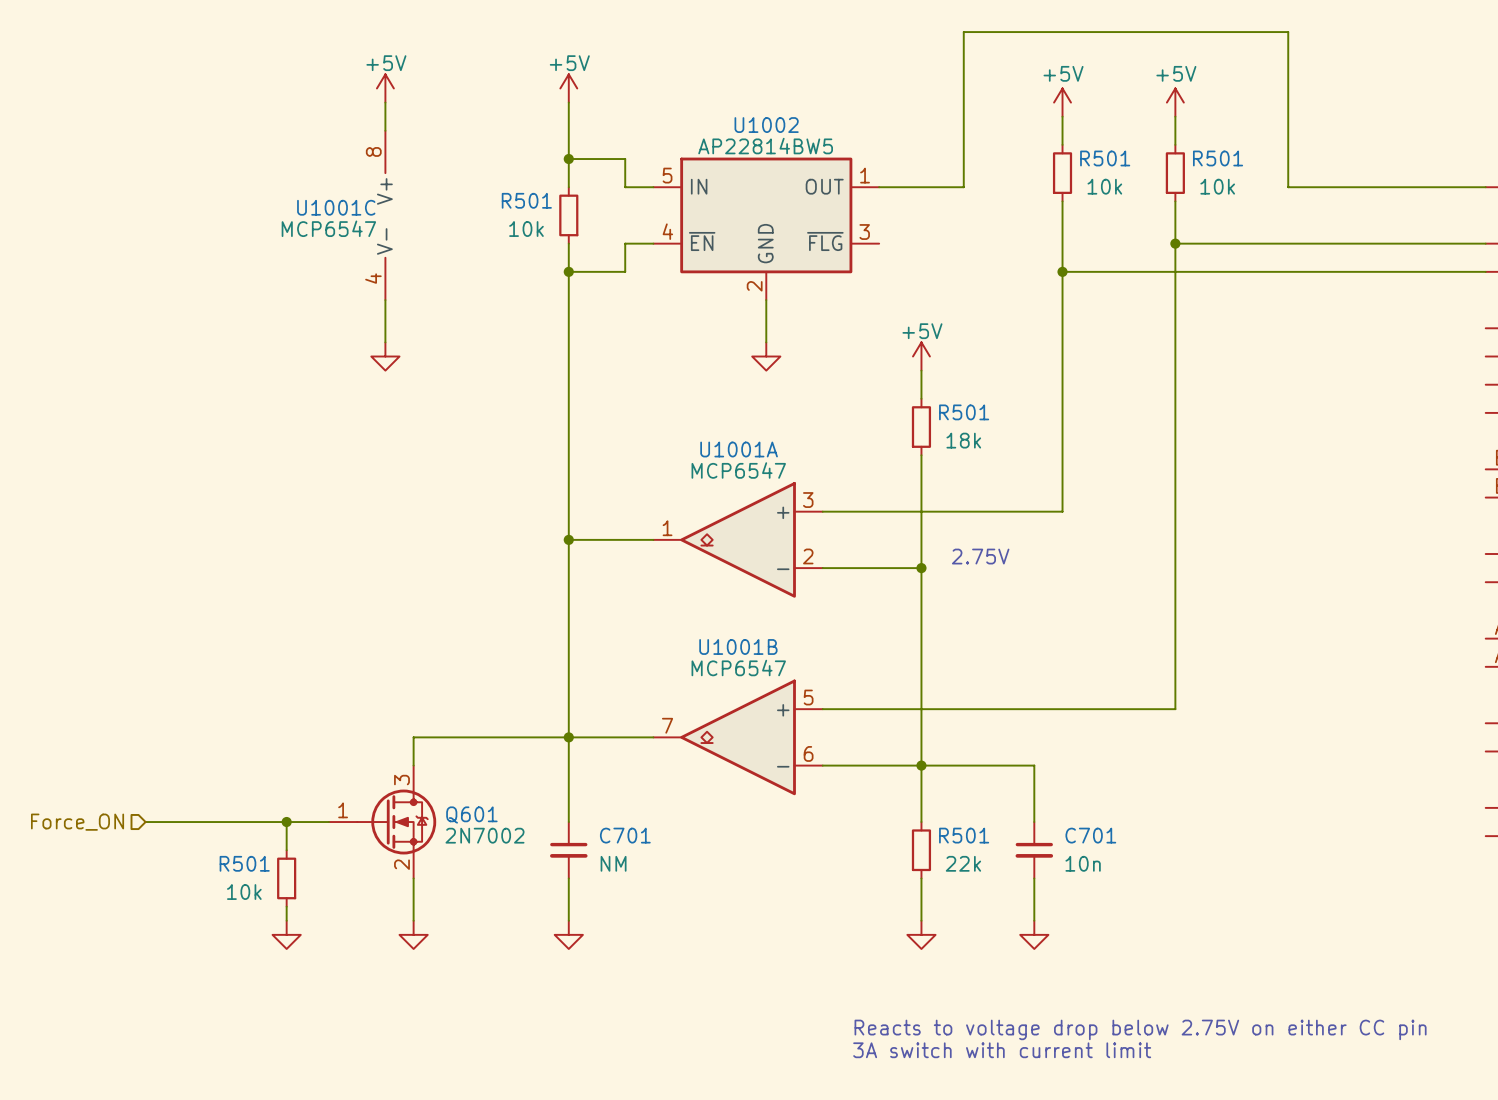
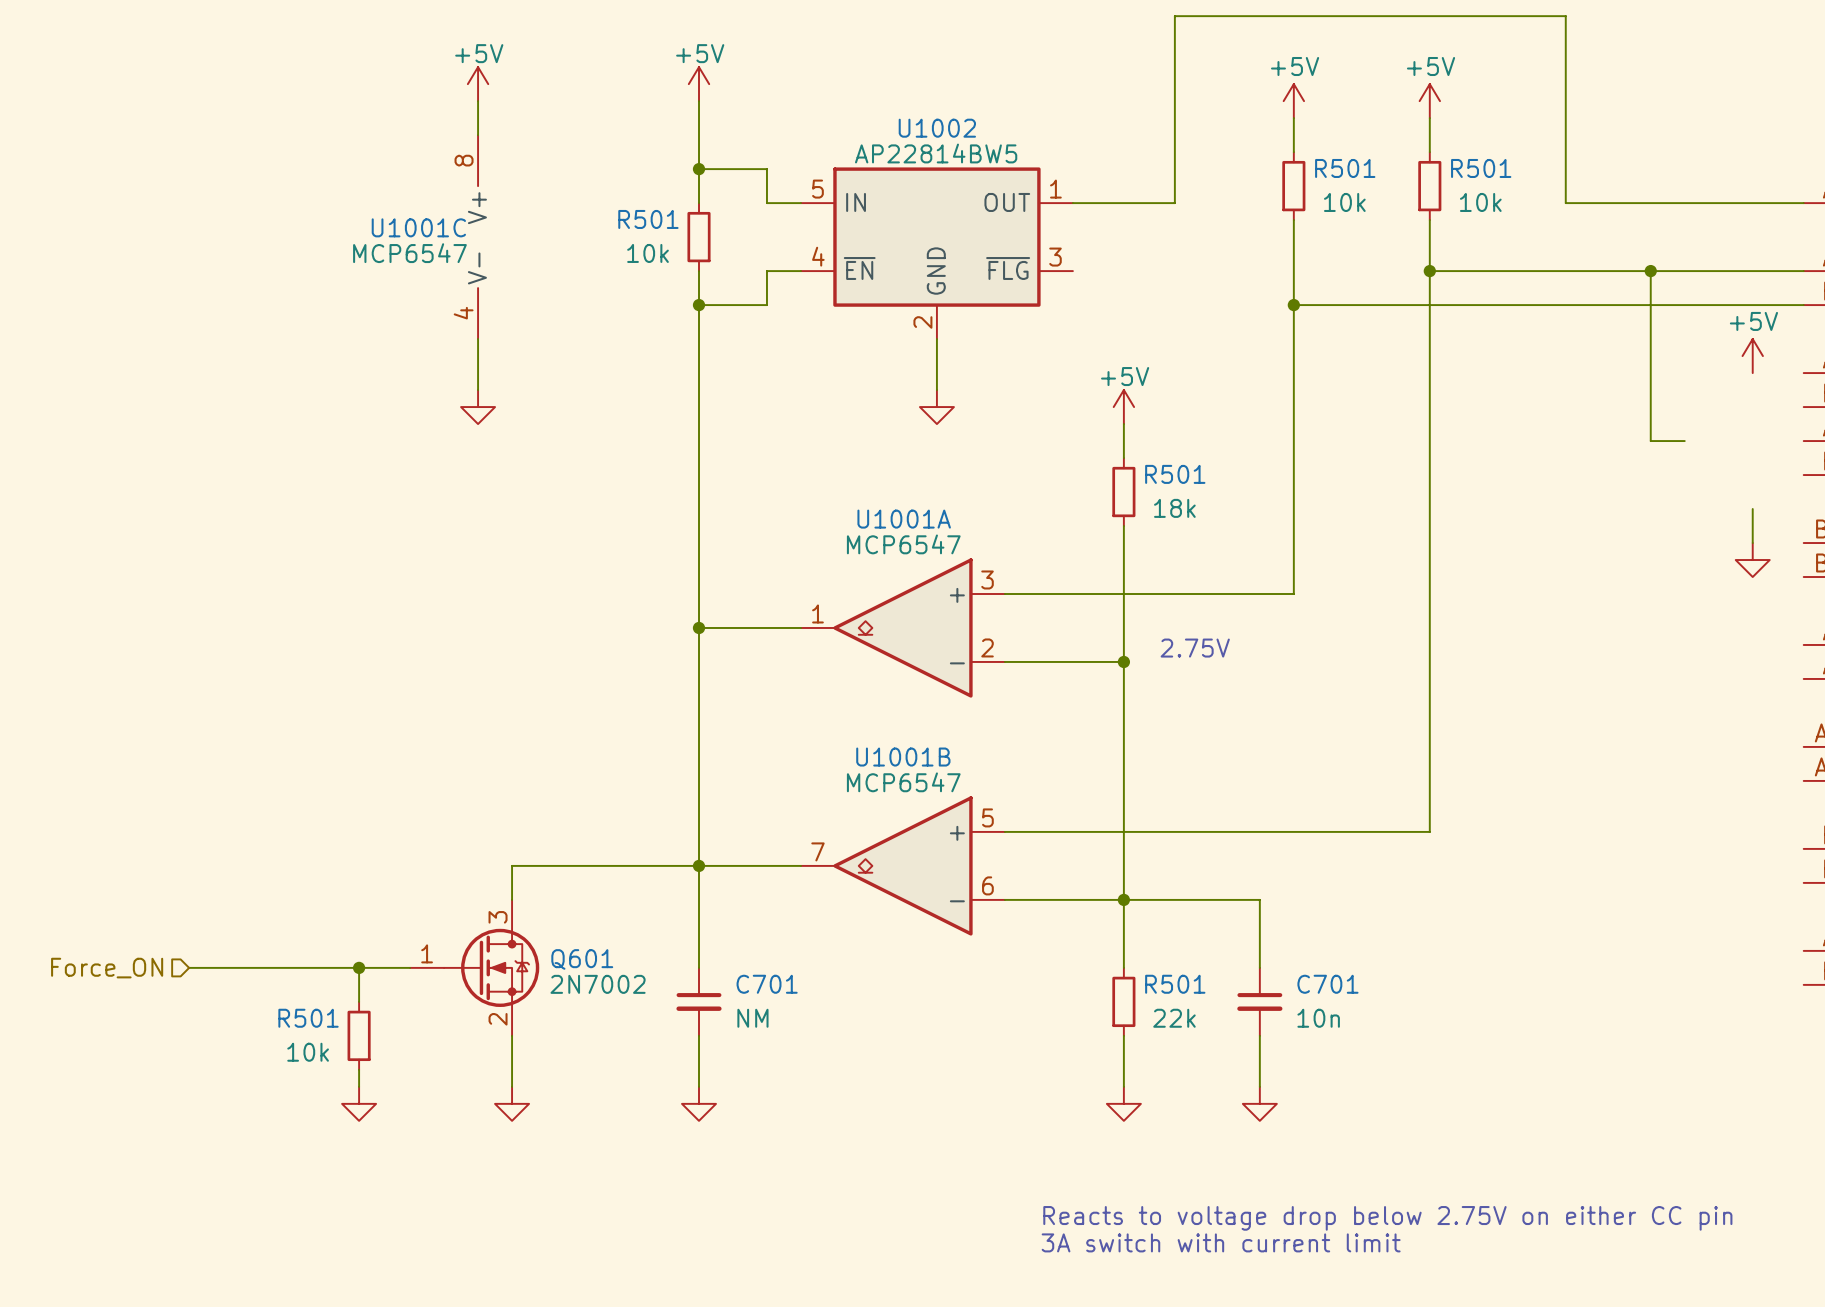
wire: none -> (1650, 271) (1650, 441) (1684, 441)
junction: none -> (1650, 271)
power symbol: none -> +5V (1752, 356)
wire: none -> (1752, 509) (1752, 543)
power symbol: none -> (1752, 560)

